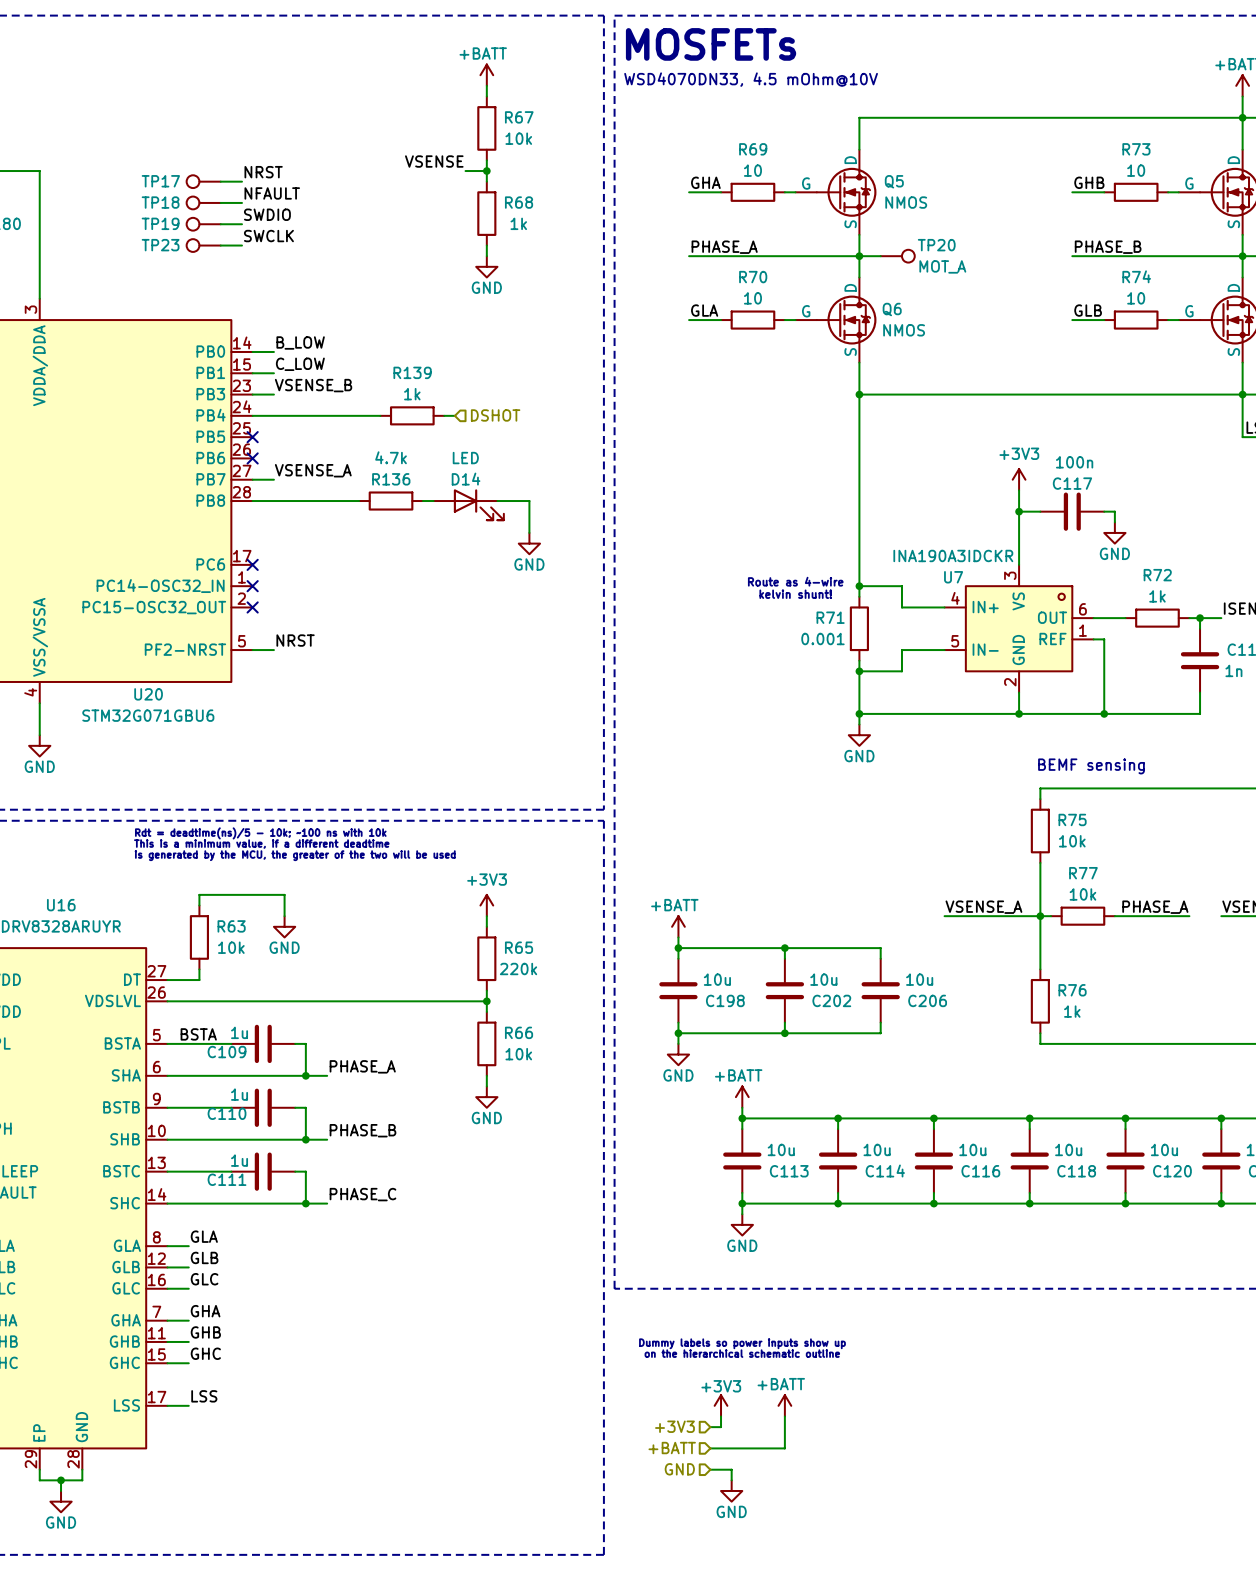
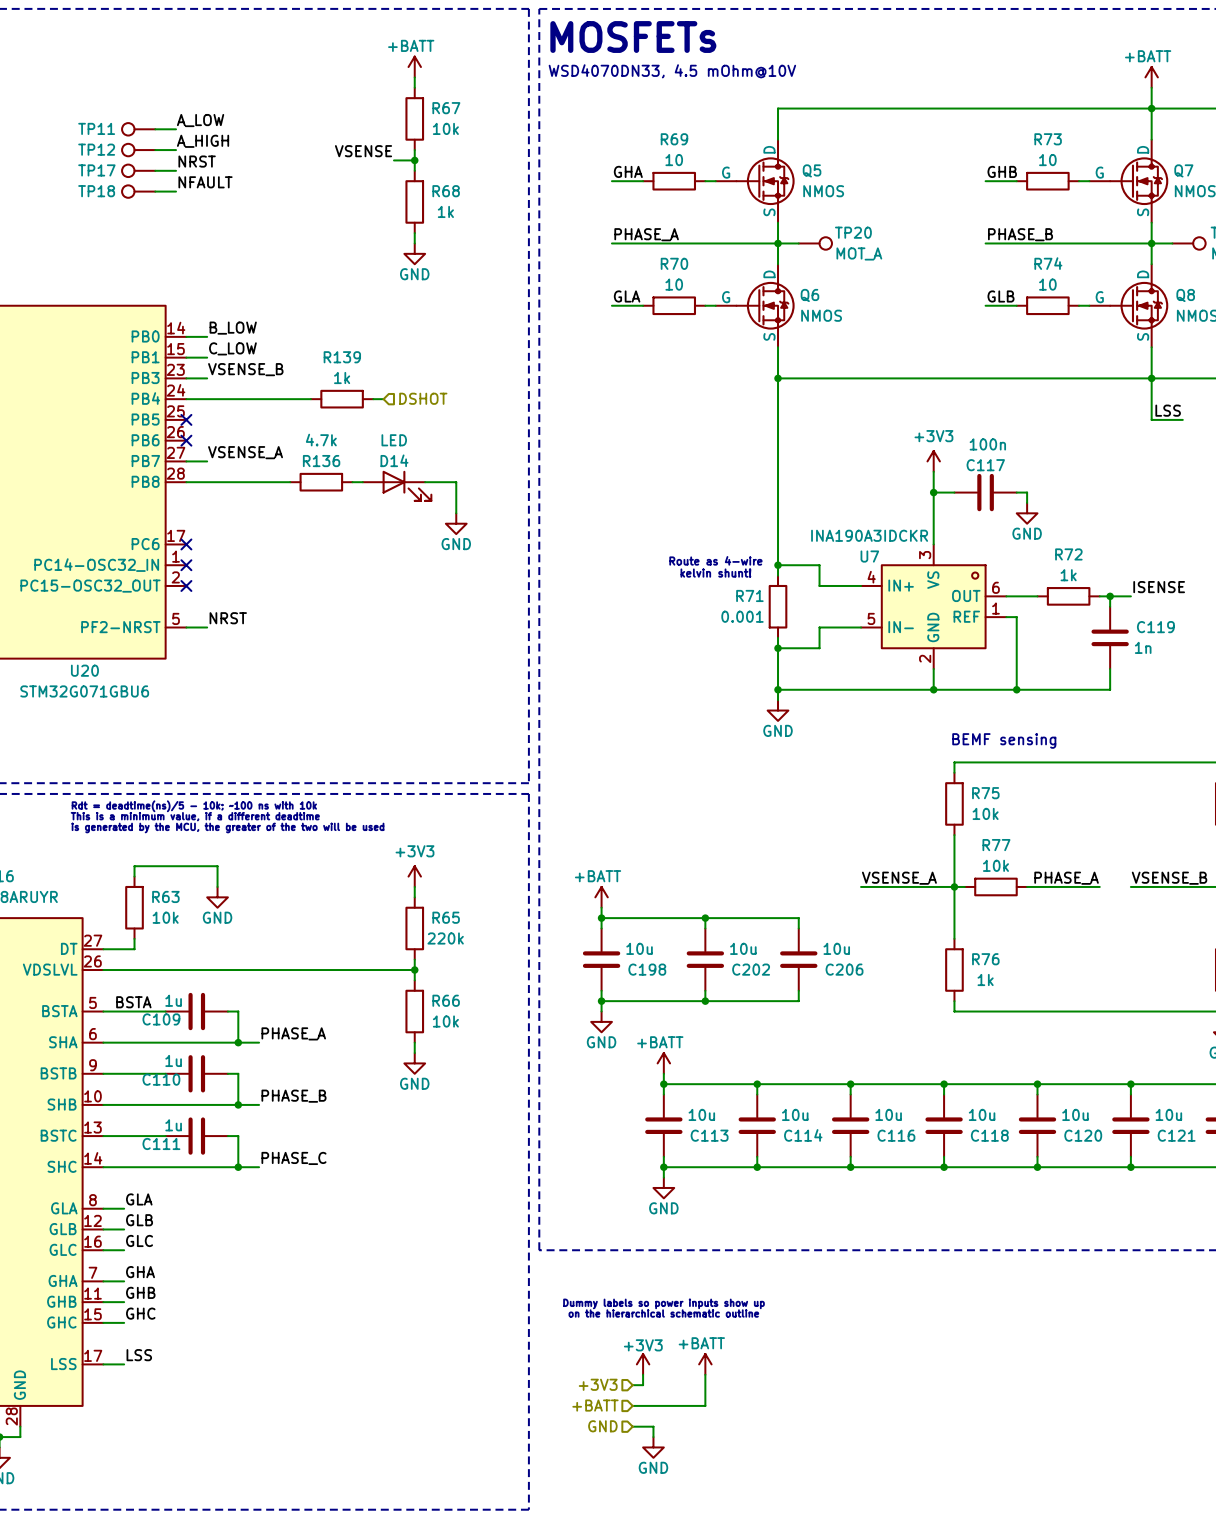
label: none -> A_LOW (200, 120)
TP11: none -> (138, 129)
label: none -> A_HIGH (203, 141)
TP12: none -> (138, 150)
label: SWDIO (267, 214) -> none
TP19: (203, 224) -> none
wire: (220, 224) (242, 224) -> (155, 150) (176, 150)
label: SWCLK (268, 236) -> none
TP23: (203, 245) -> none
wire: (220, 245) (242, 245) -> (155, 129) (176, 129)

